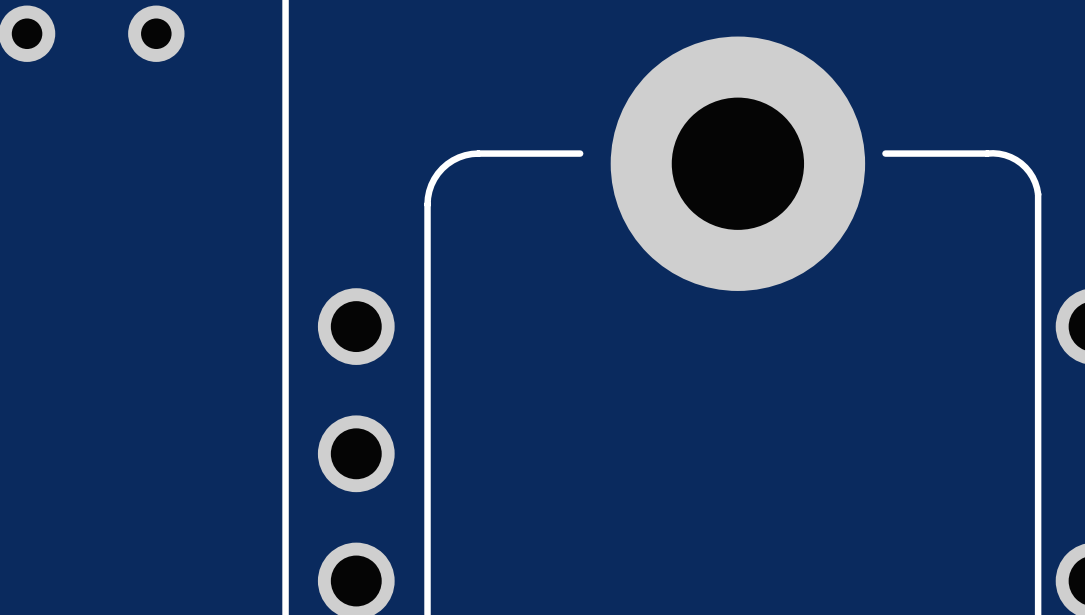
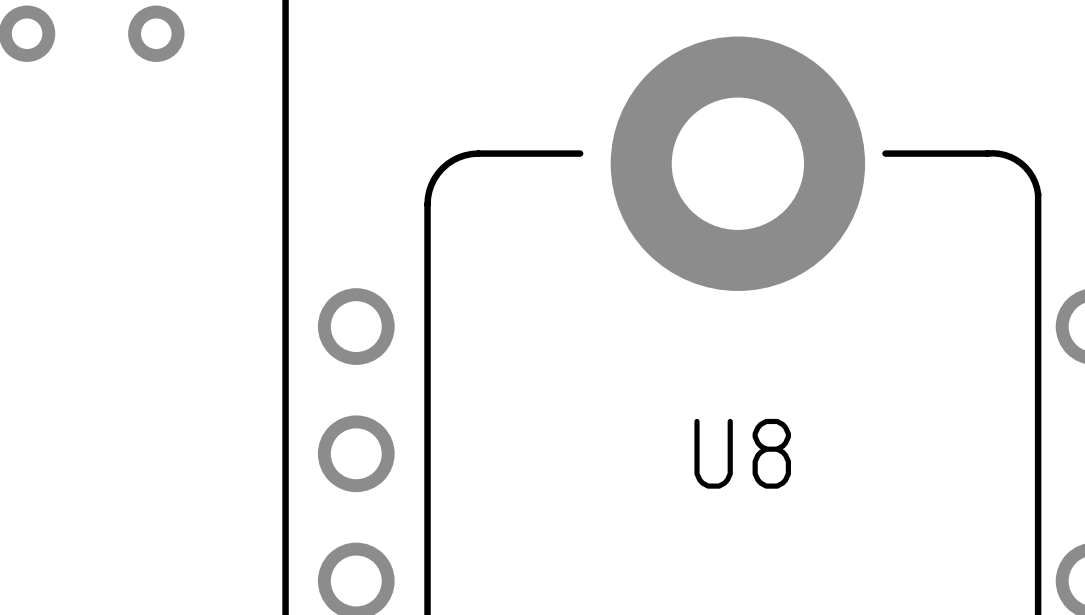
text: none -> U8 (742, 453)

